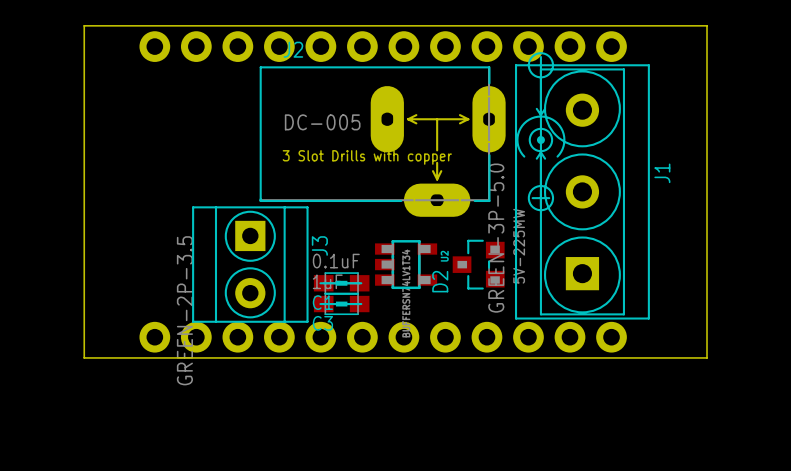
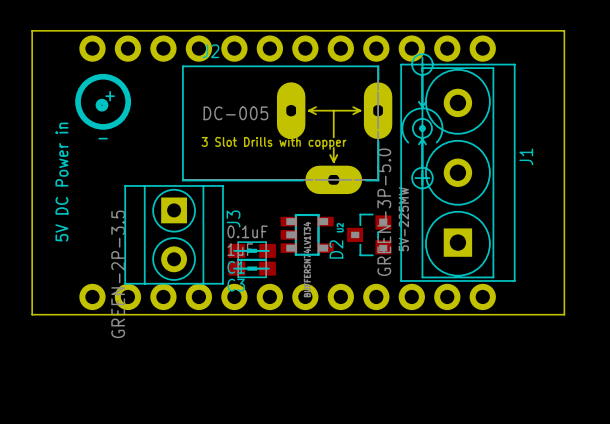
drawing: none -> [75, 73, 132, 130]
text: none -> + (110, 96)
text: none -> - (103, 138)
text: none -> 5V DC Power in (61, 182)

